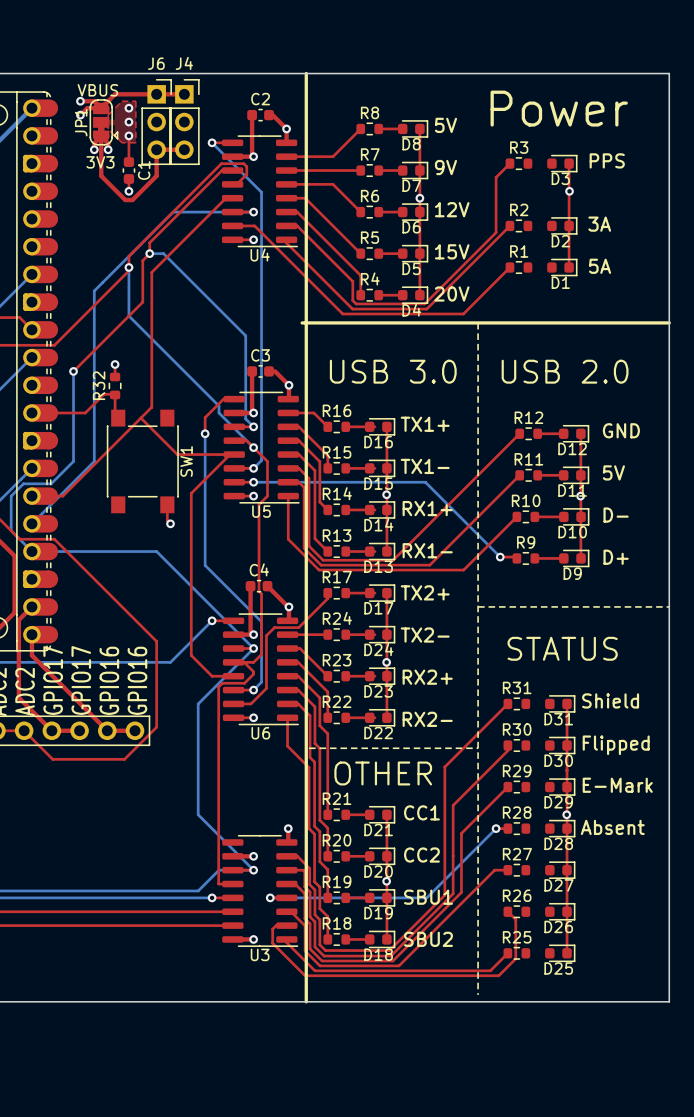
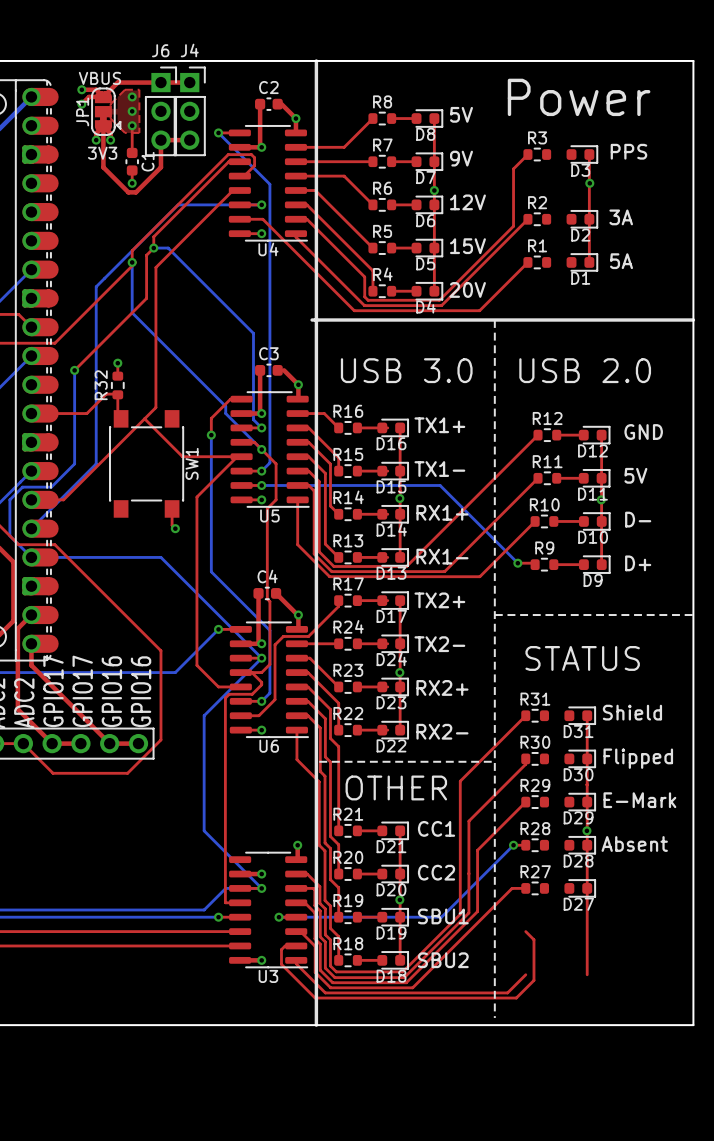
R26: (516, 911) -> none
D26: (560, 911) -> none
R25: (516, 953) -> none
D25: (560, 953) -> none

